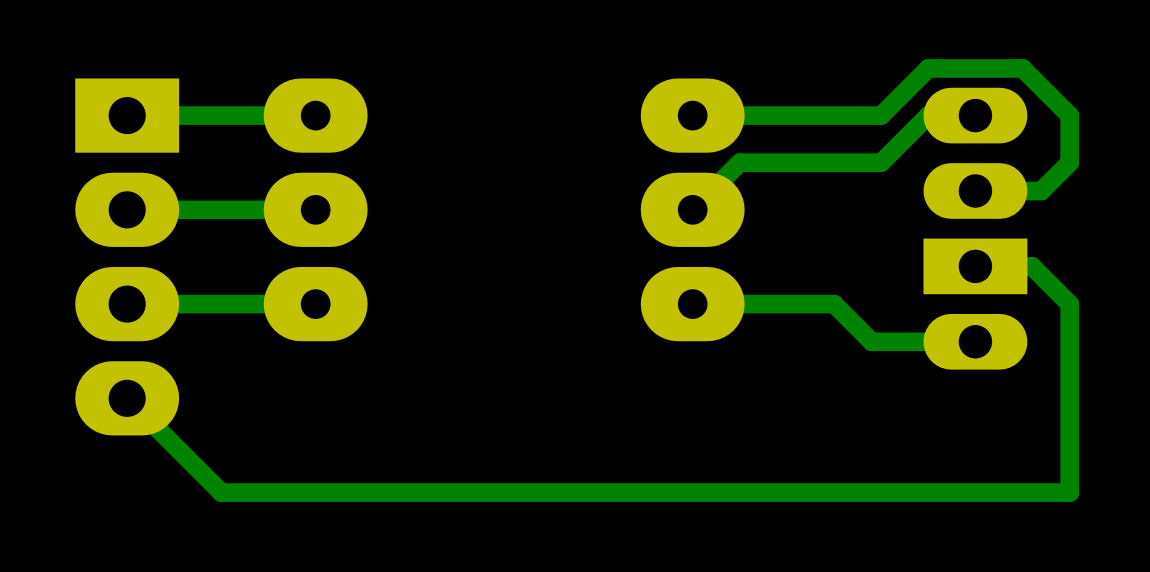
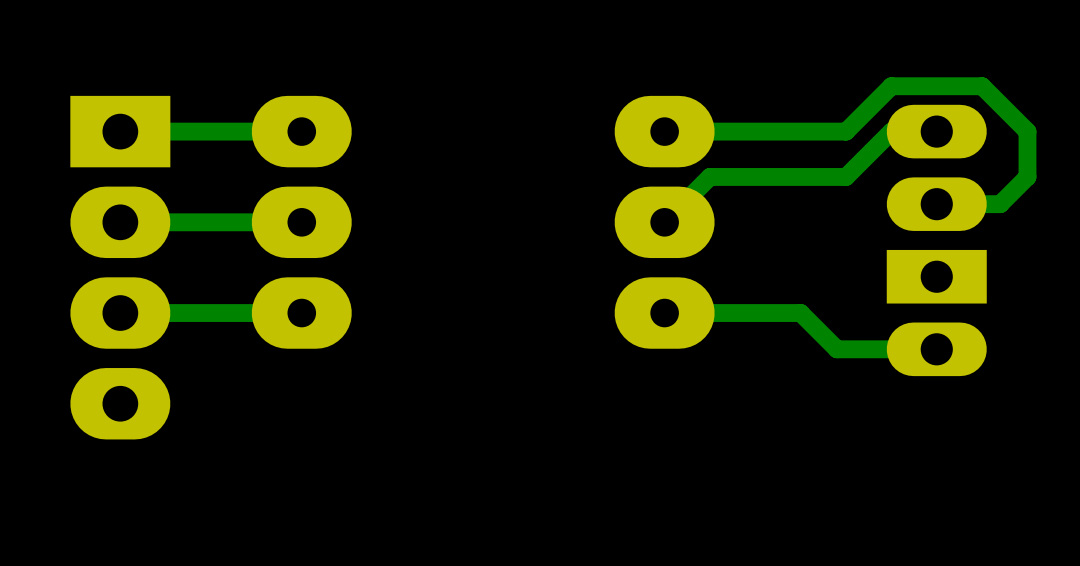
track: (975, 266) (1031, 266) (1069, 304) (1069, 492) (221, 492) (127, 398) -> none

